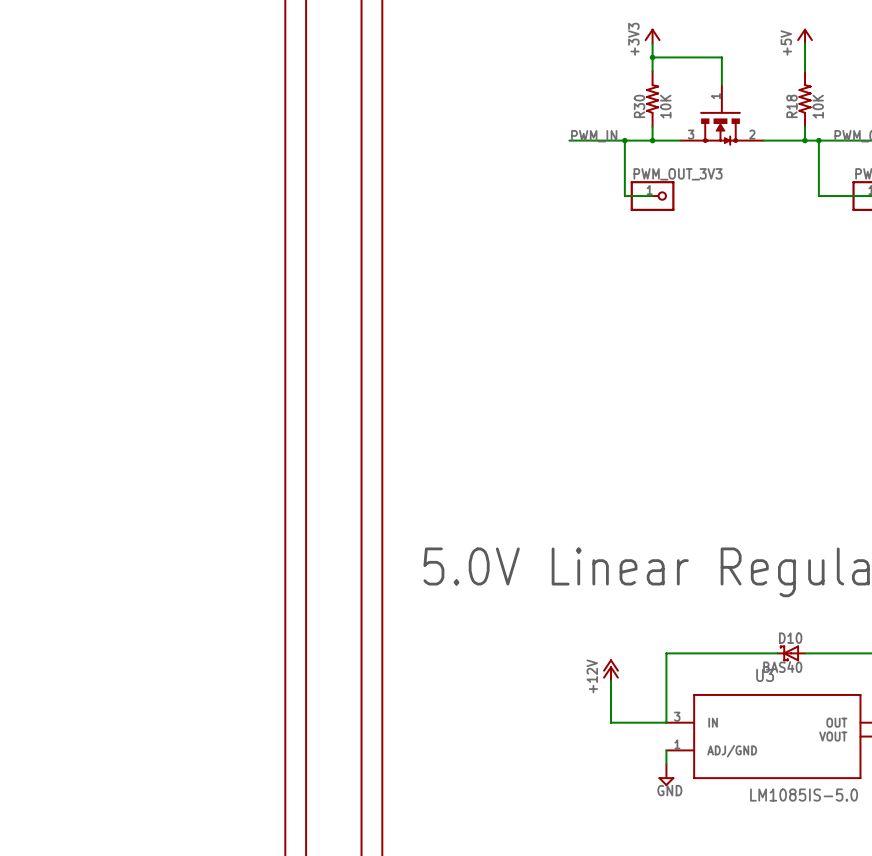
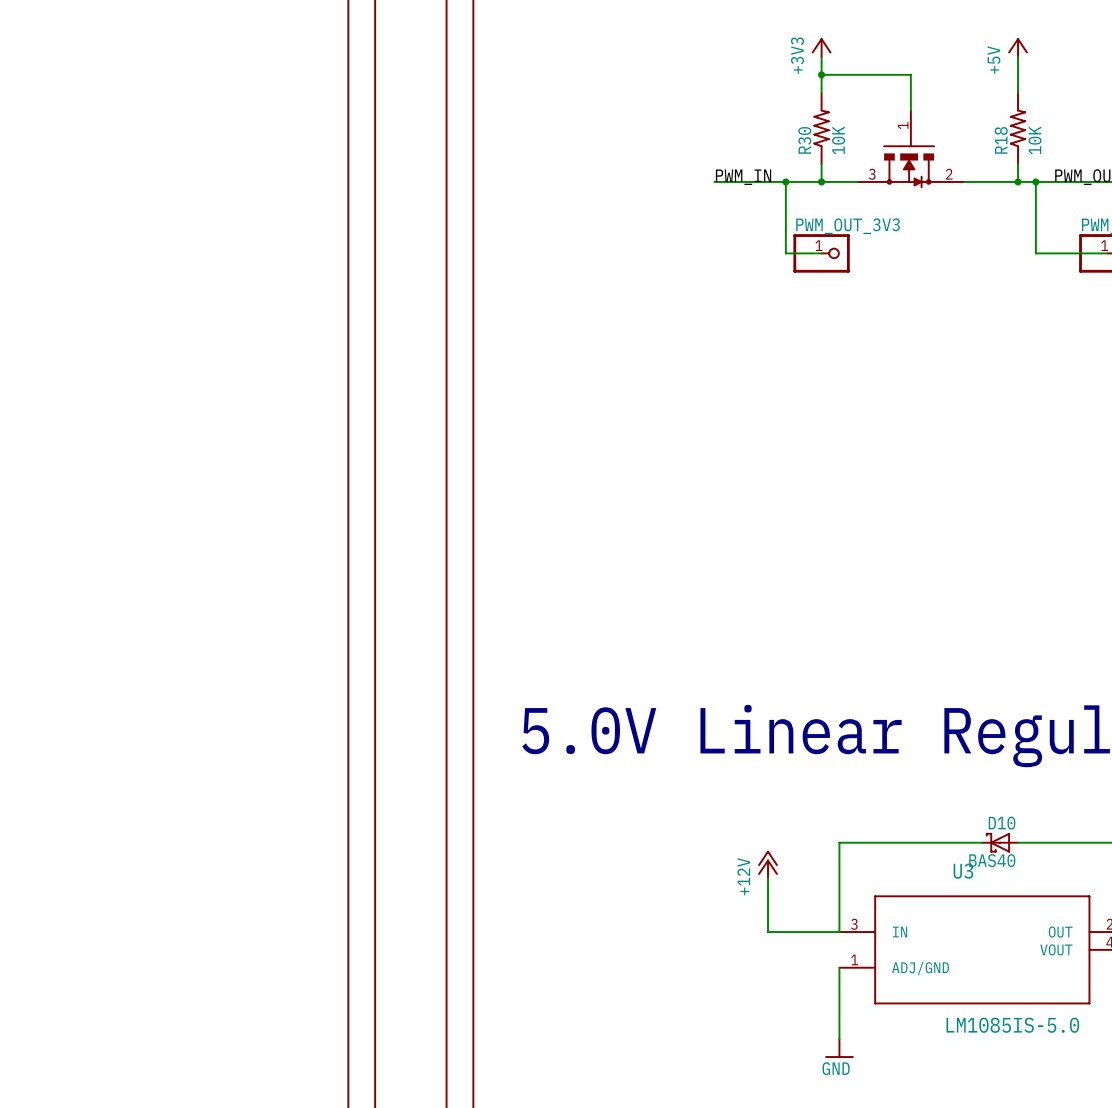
wire: none -> (839, 985) (839, 1039)
power symbol: GND (666, 775) -> none
power symbol: none -> GND (839, 1048)

